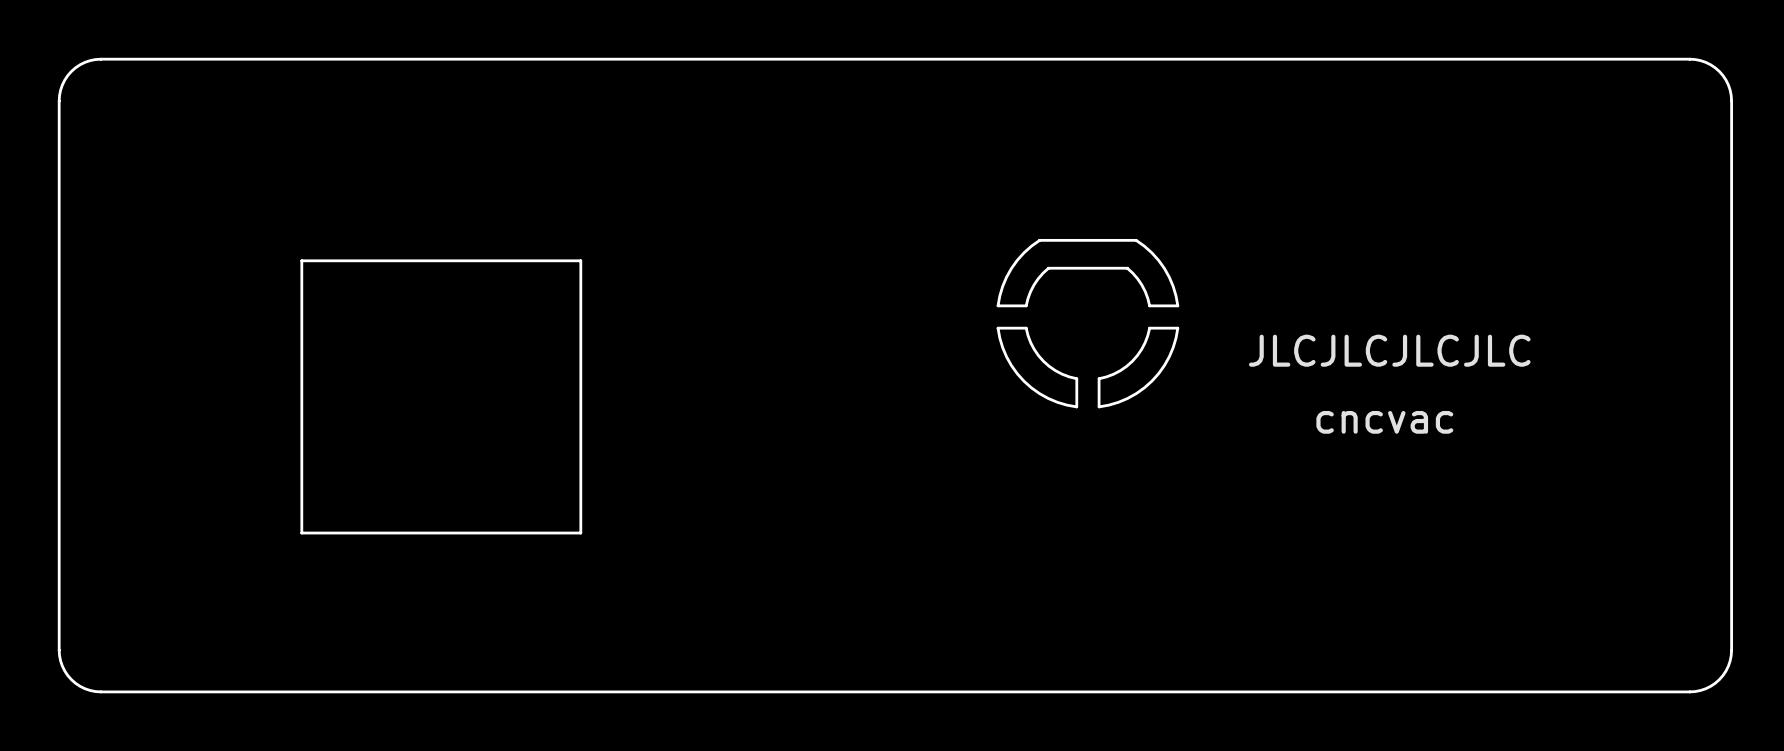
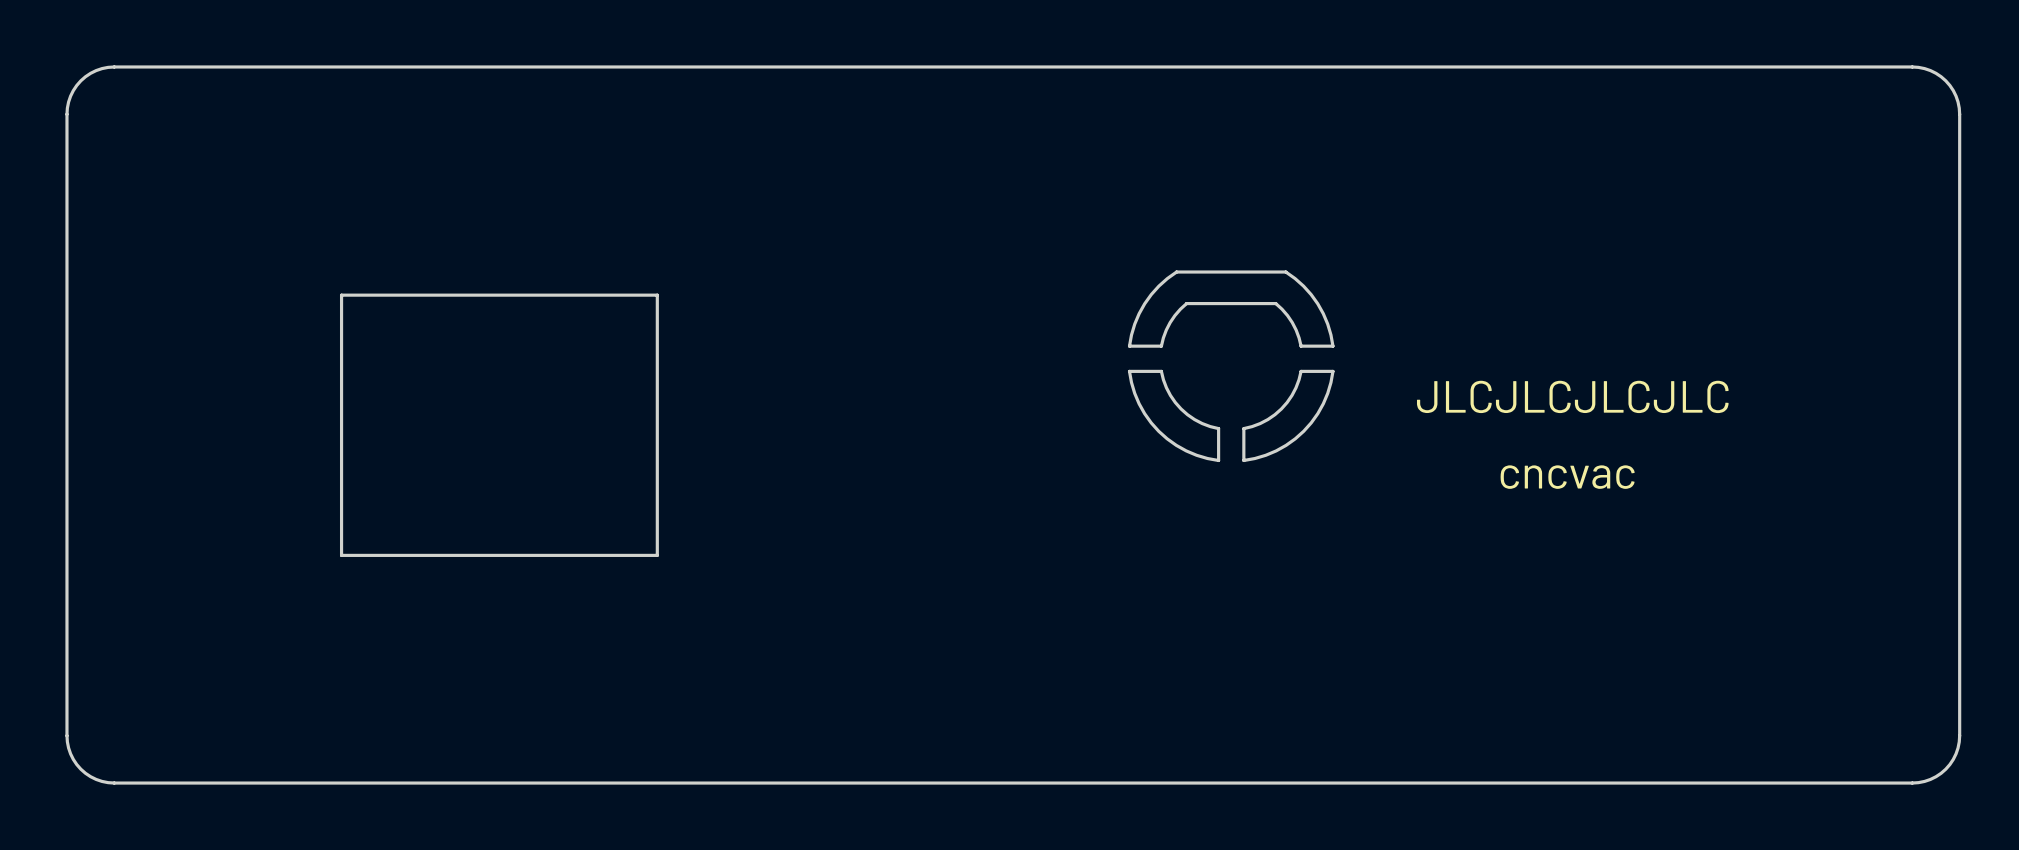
board edge: (580, 490) (580, 533) (301, 533) (301, 490) -> (657, 555) (341, 555)

